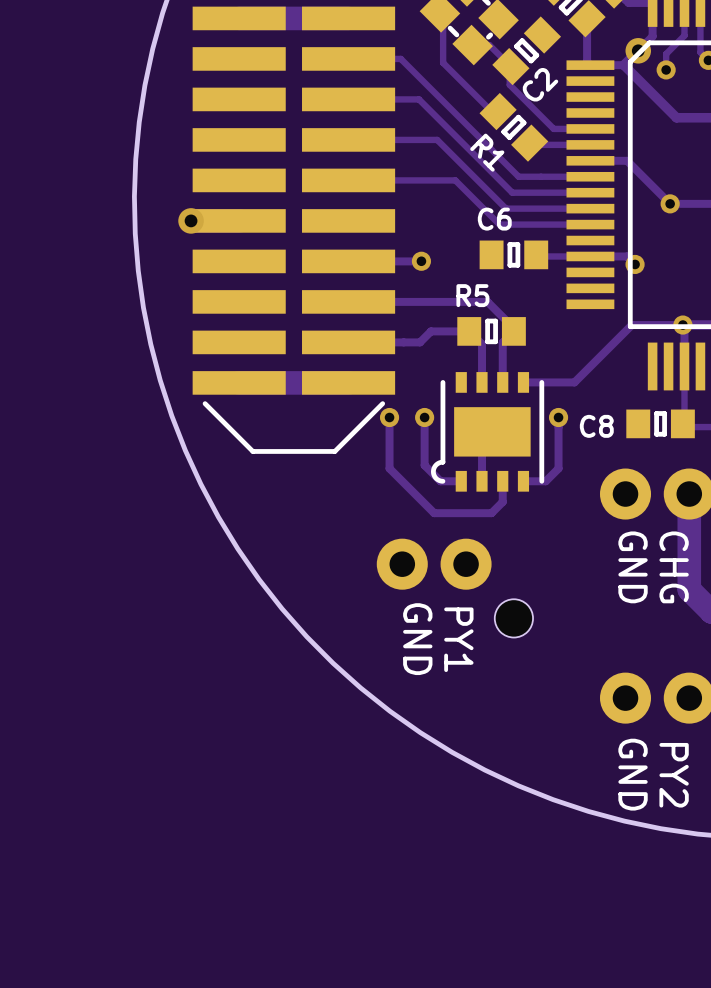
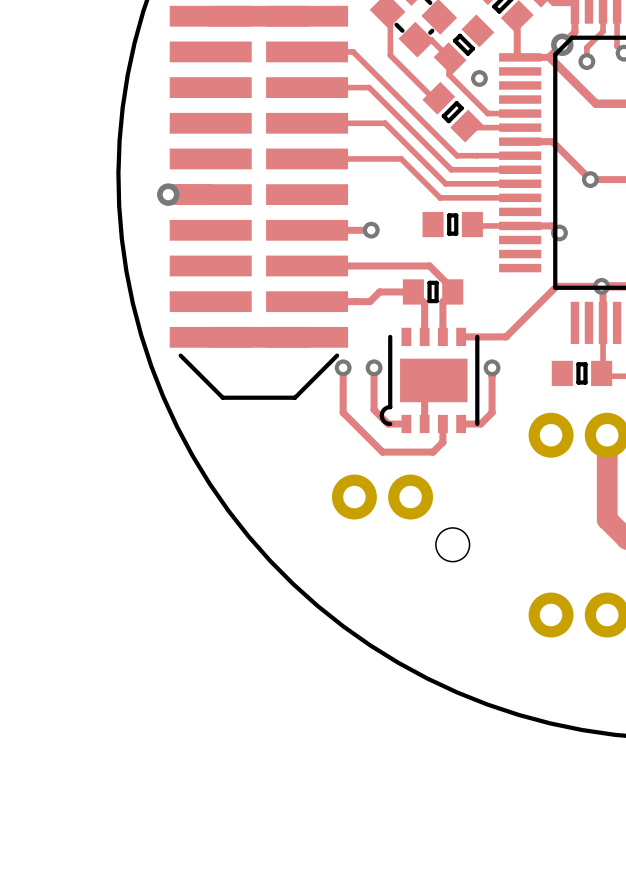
text: C2 (540, 84) -> none
via: none -> (479, 78)
text: R1 (487, 152) -> none
text: C6 (494, 219) -> none
text: R5 (472, 295) -> none
text: C8 (596, 426) -> none
text: GND (633, 567) -> none
text: CHG (674, 567) -> none
text: GND (417, 639) -> none
text: PY1 (458, 639) -> none
text: GND (633, 774) -> none
text: PY2 (674, 775) -> none

